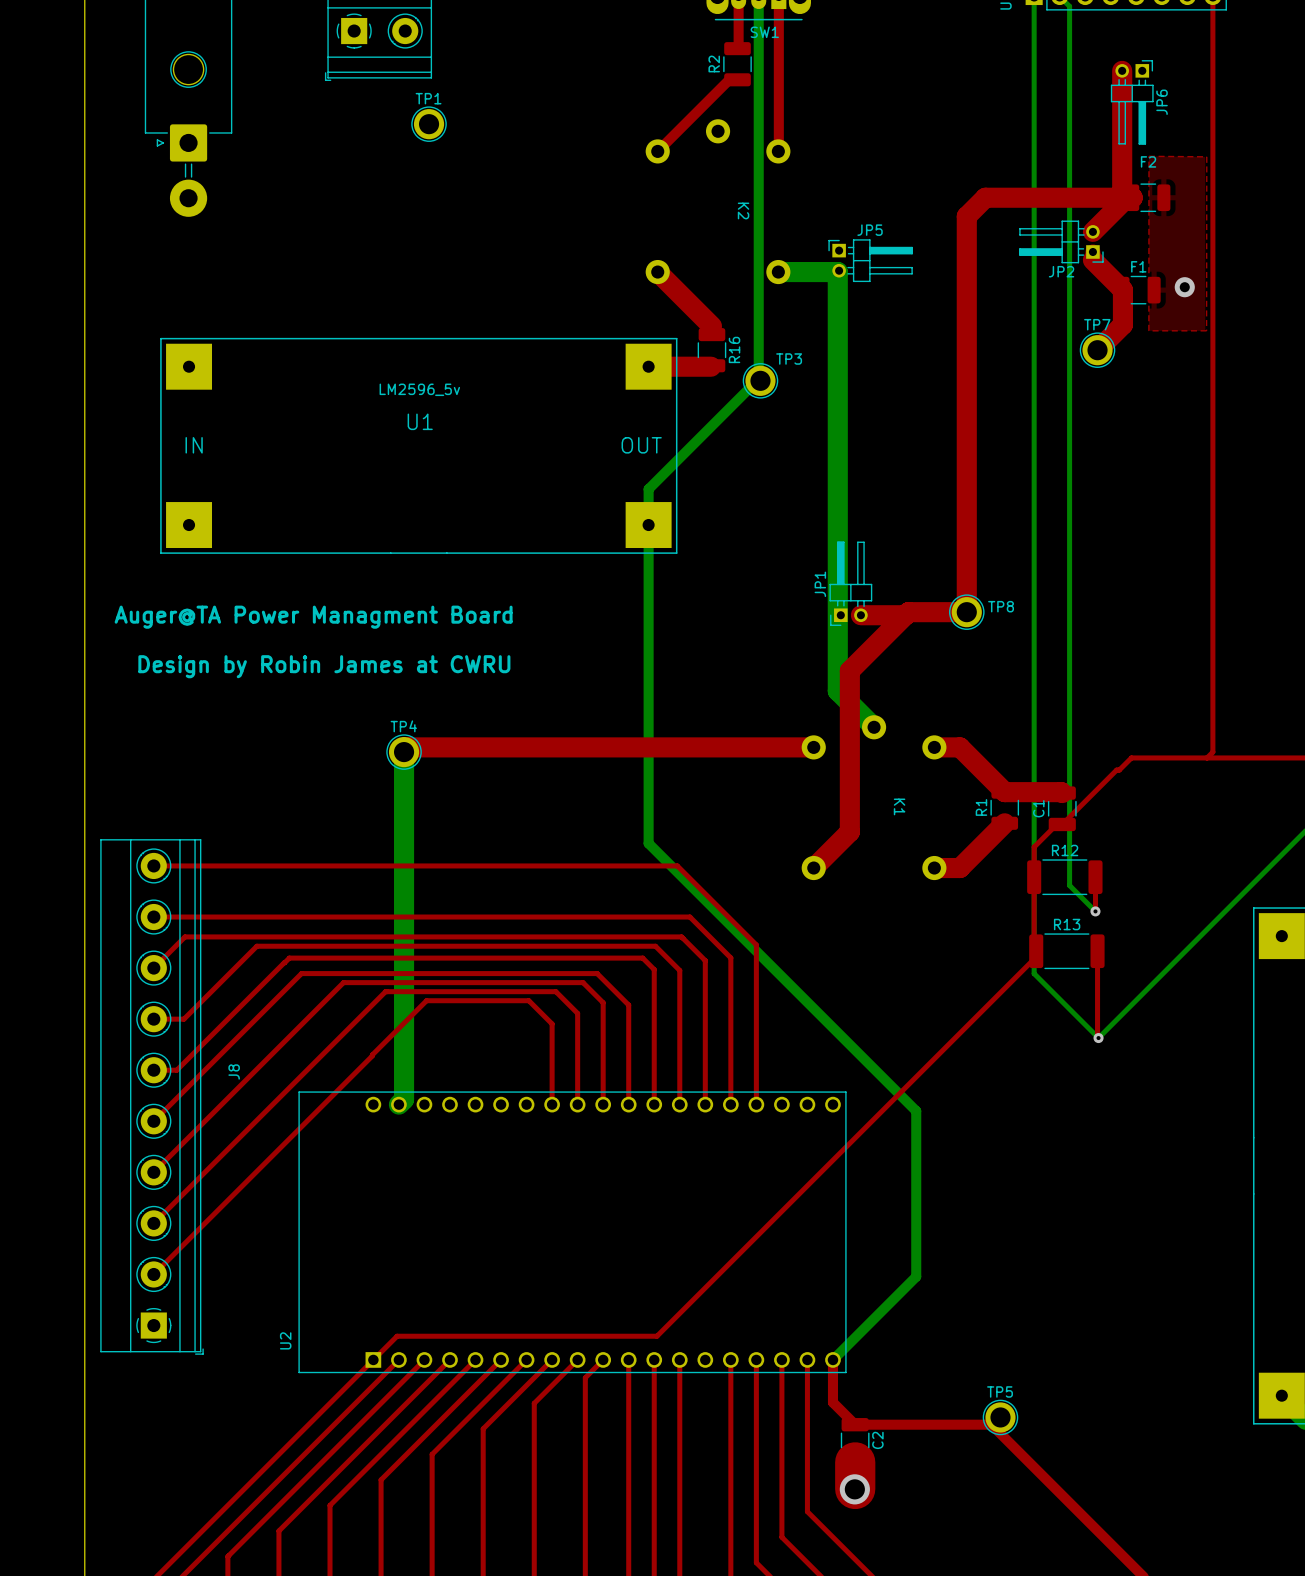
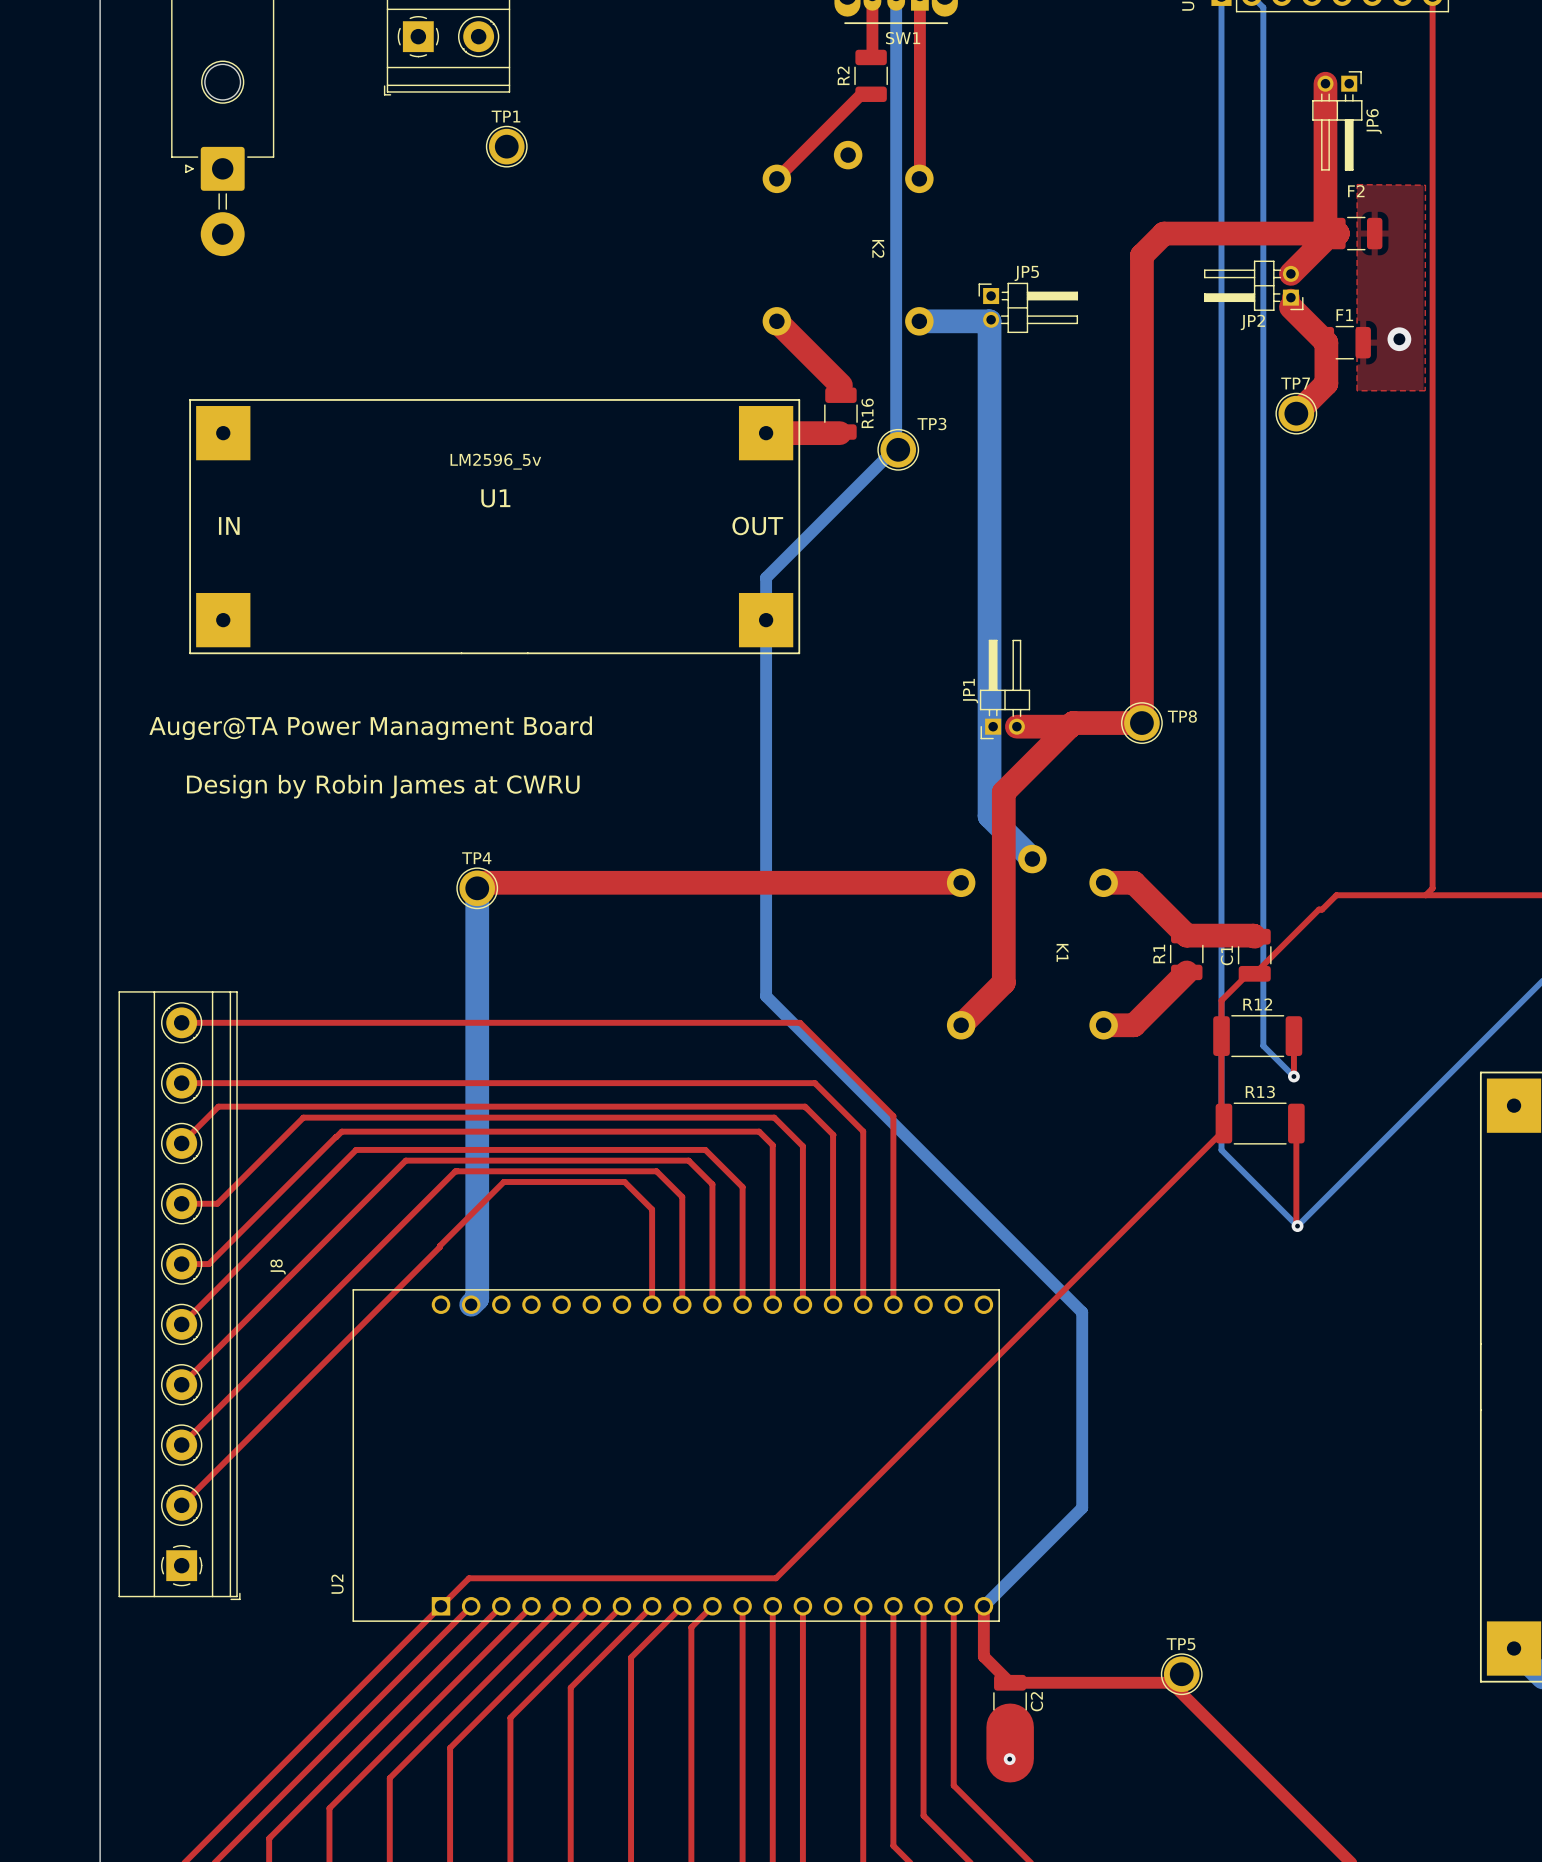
via size: [839, 1474, 870, 1505] -> [1003, 1753, 1016, 1766]

